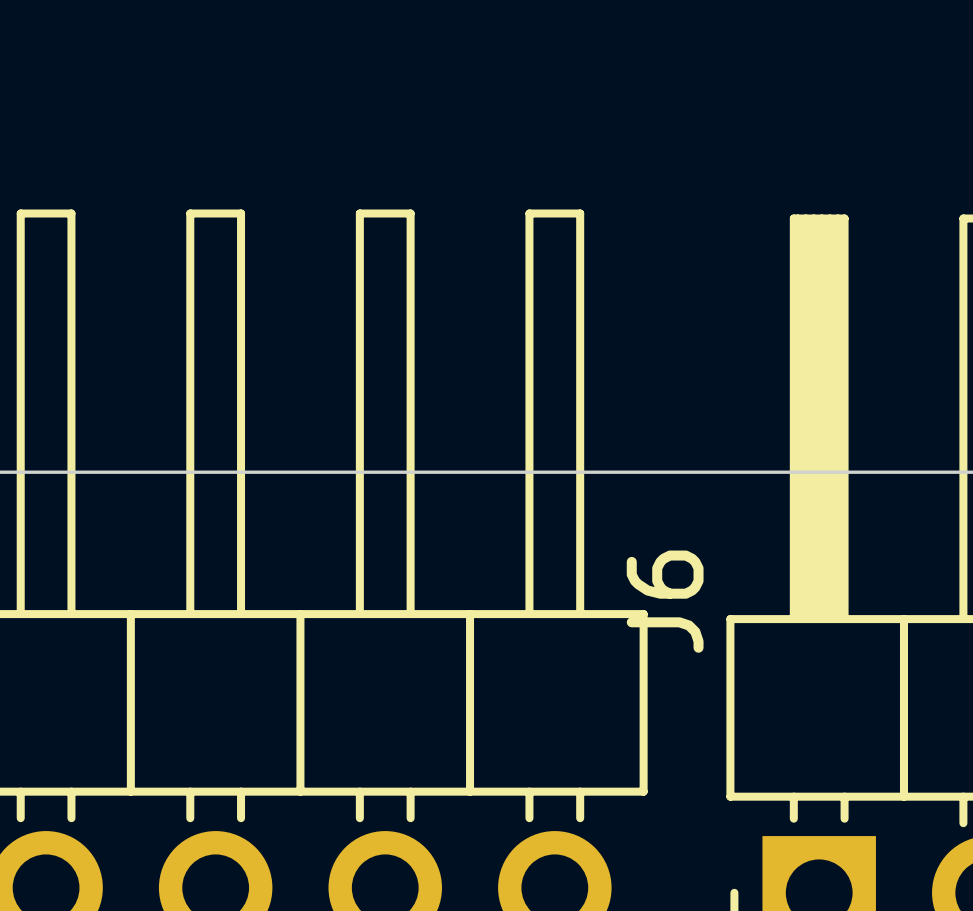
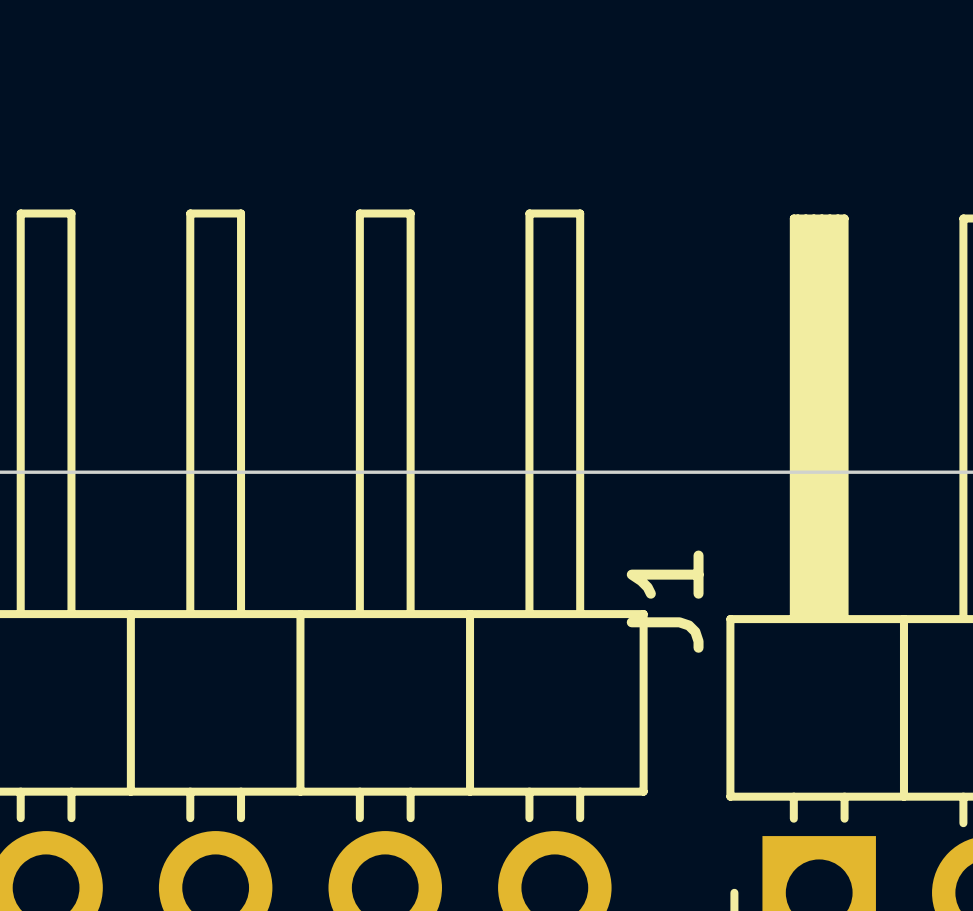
J6 name: J6 (665, 601) -> J1 (665, 601)

